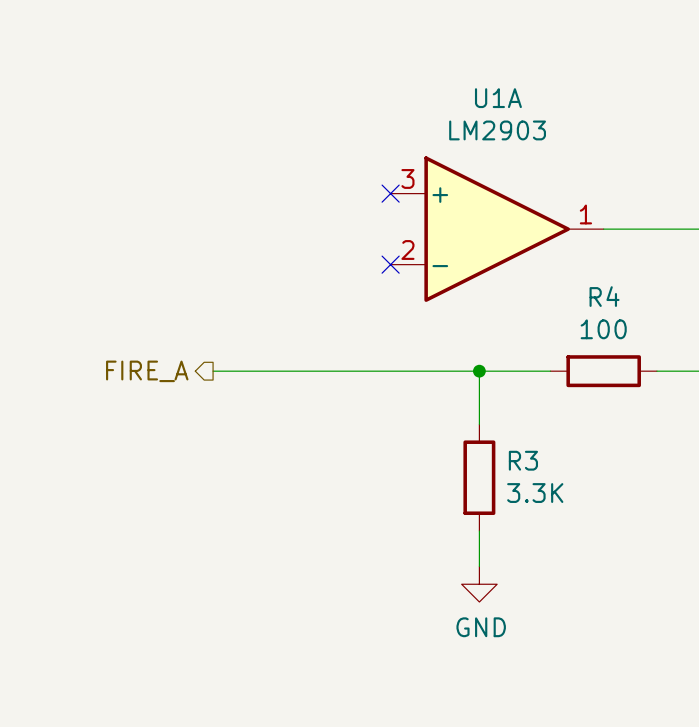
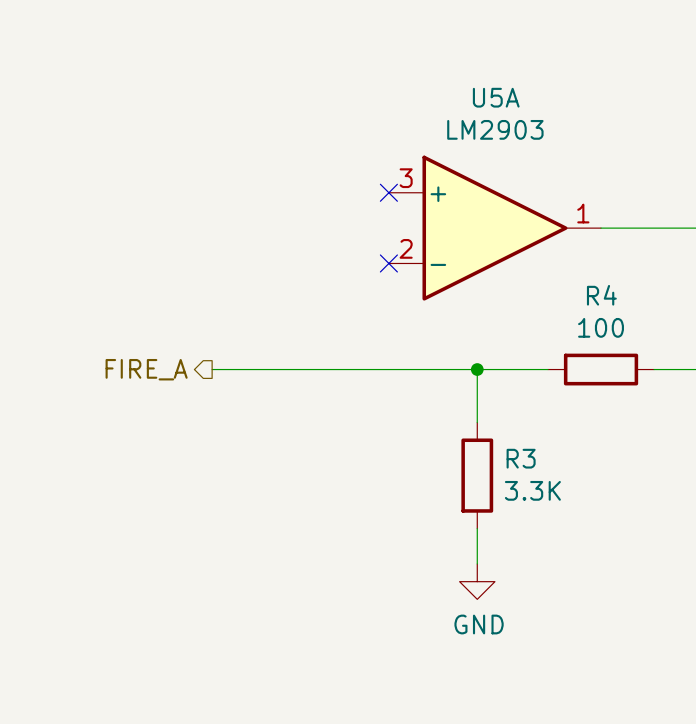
U1A name: U1A (498, 98) -> U5A (496, 97)

